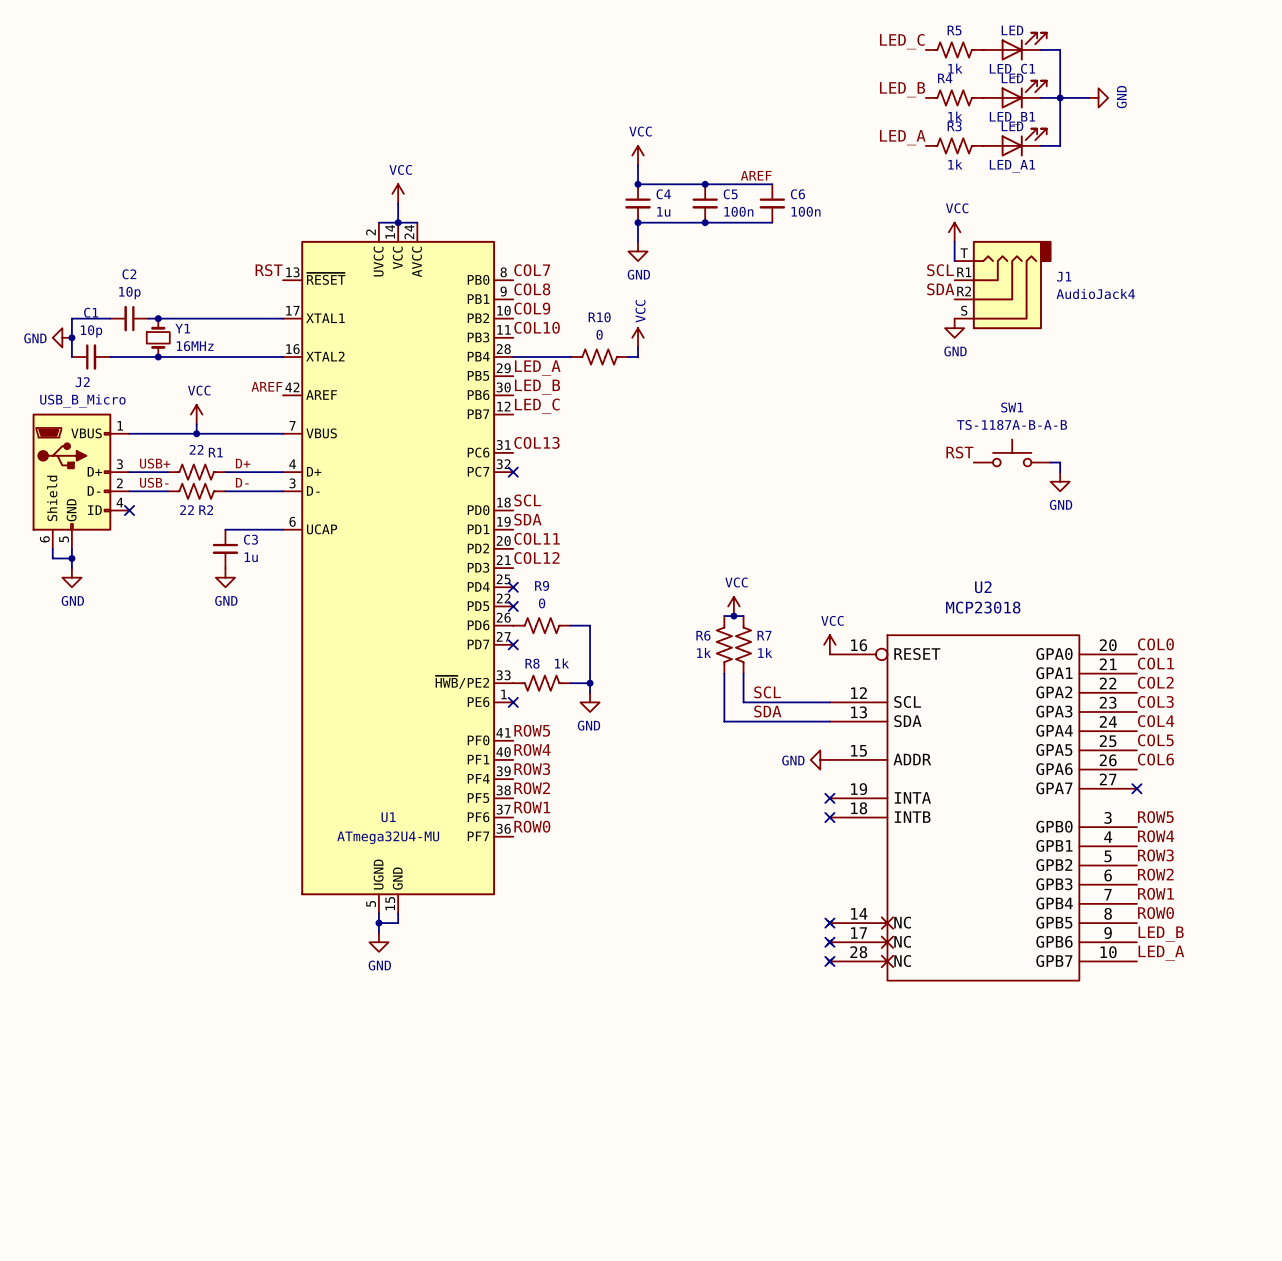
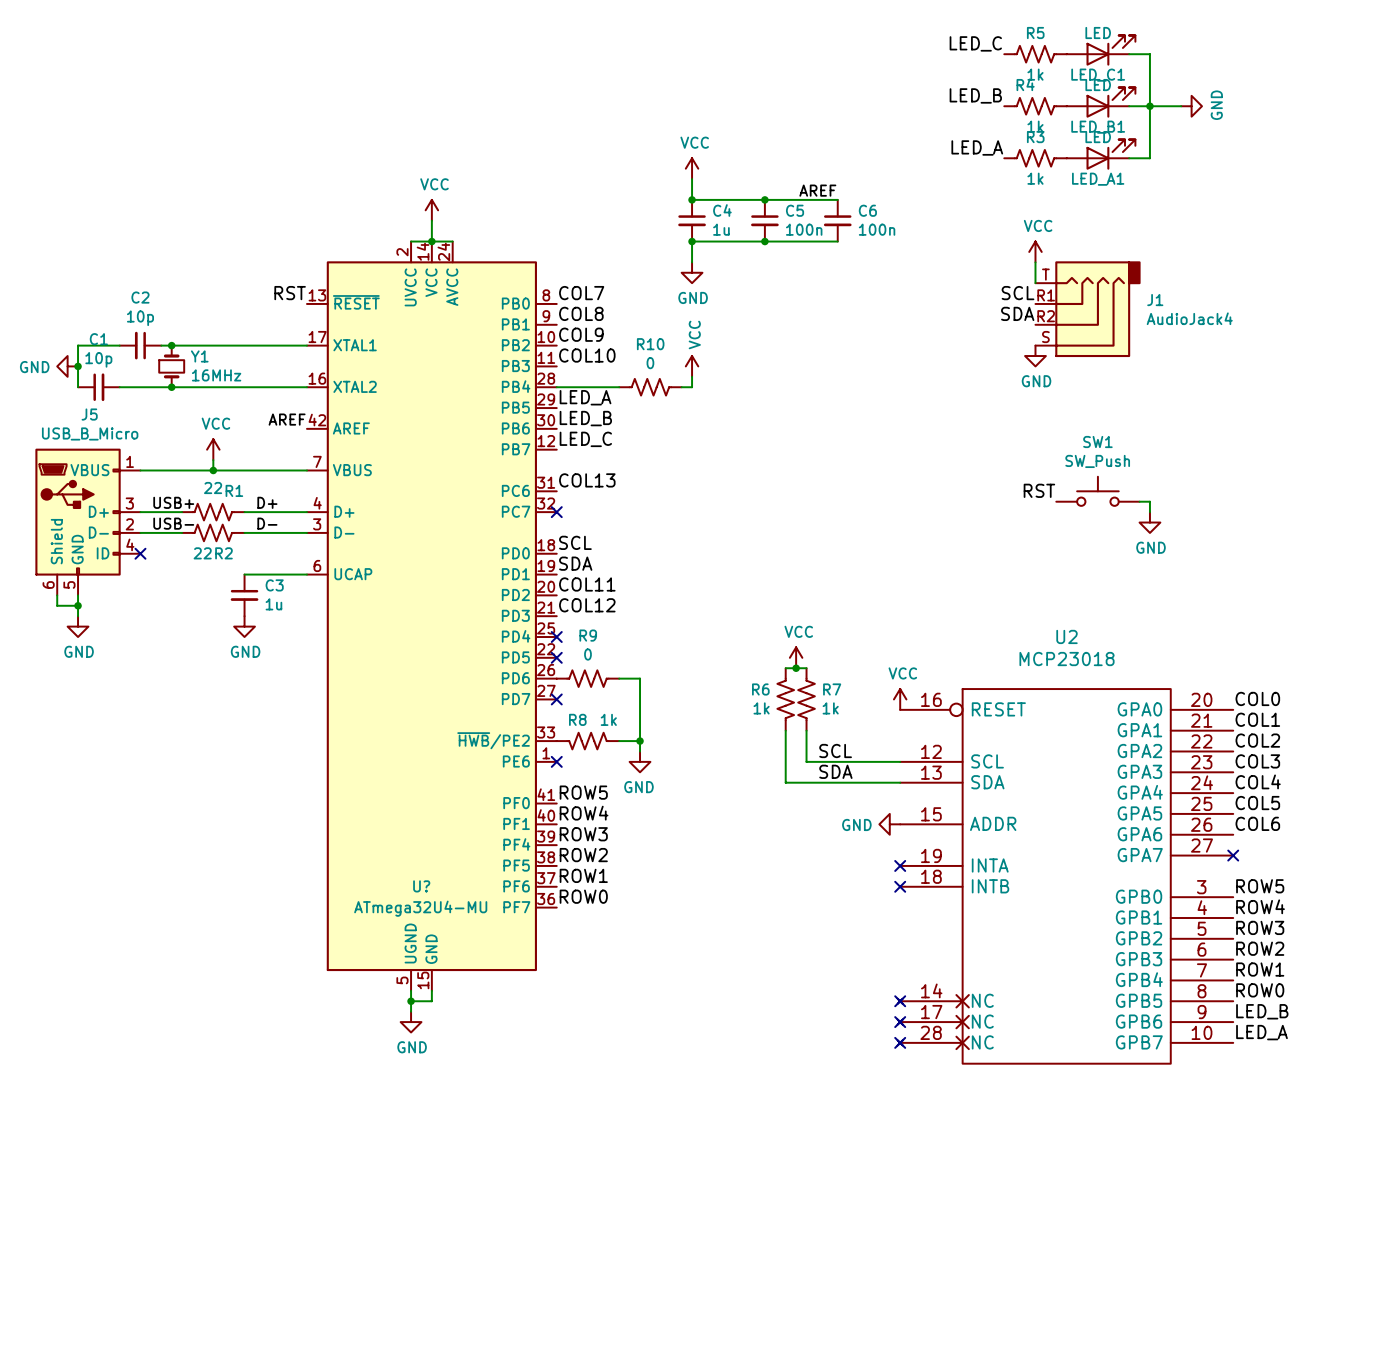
J2 name: J2 (82, 382) -> J5 (89, 414)
SW1 value: TS-1187A-B-A-B (1012, 424) -> SW_Push (1097, 461)
U1 name: U1 (388, 817) -> U? (421, 886)

